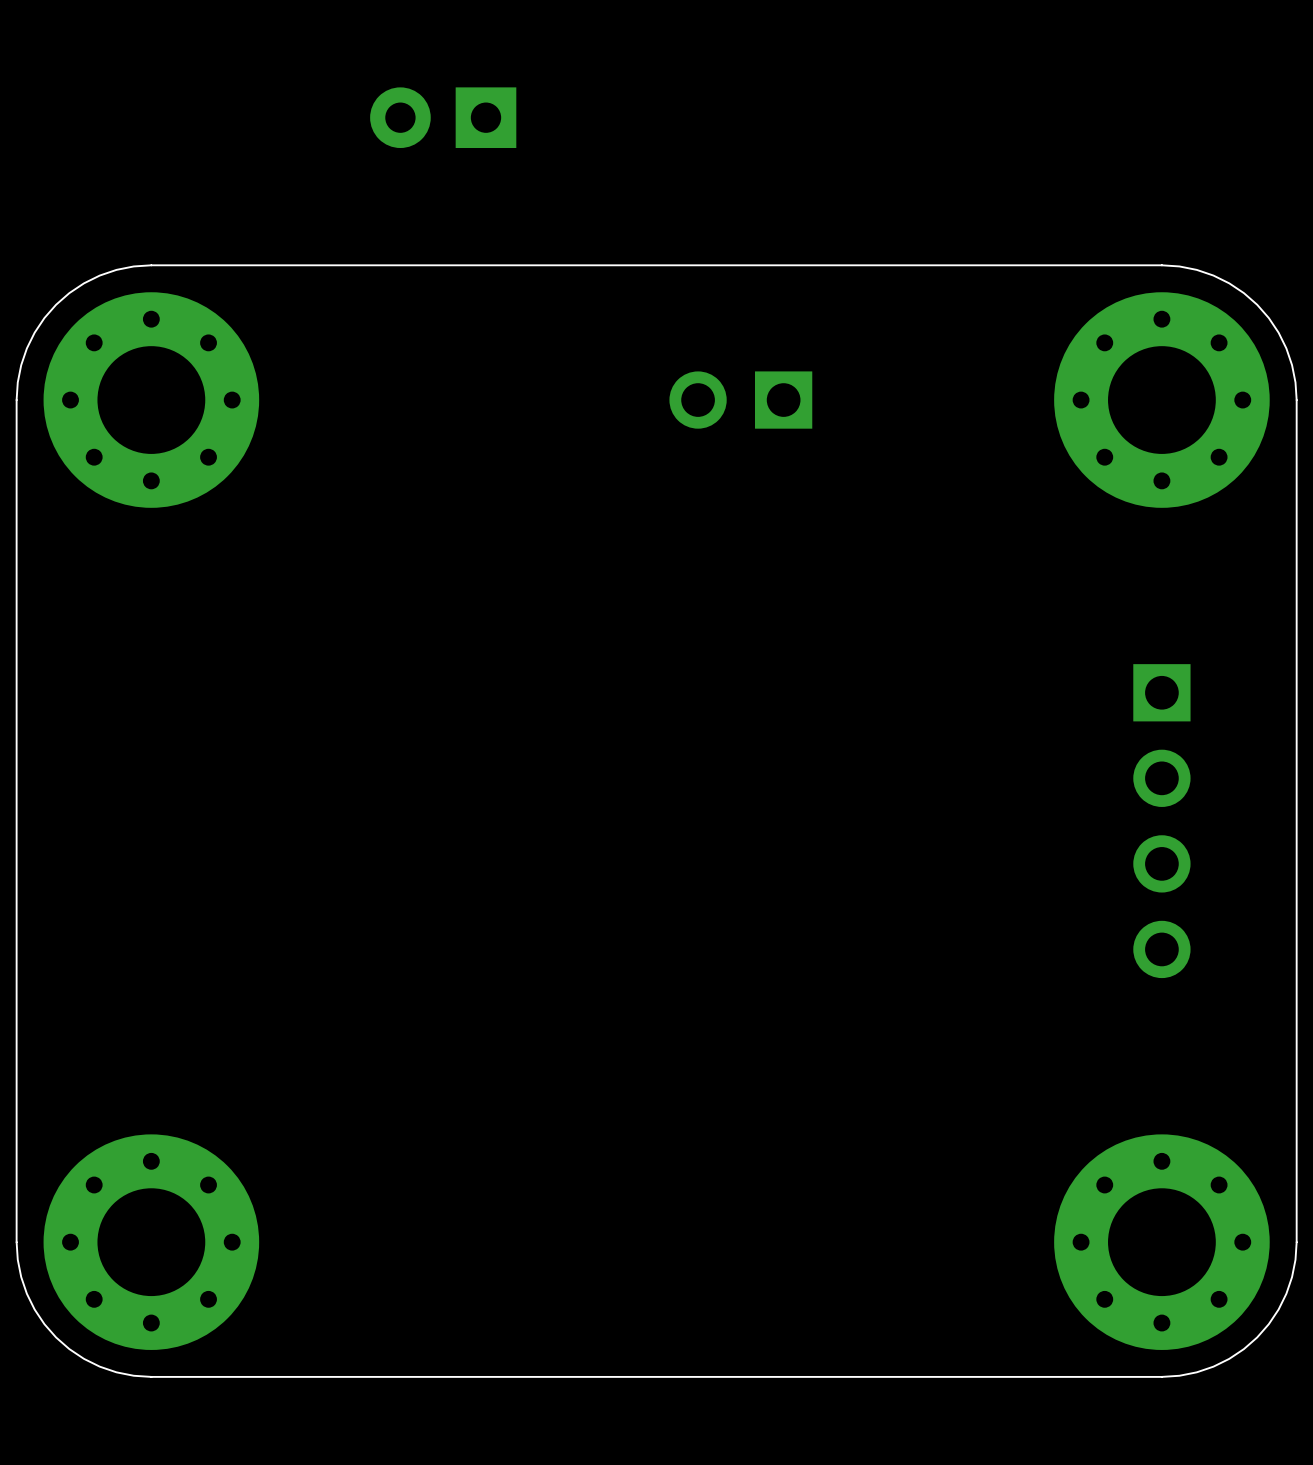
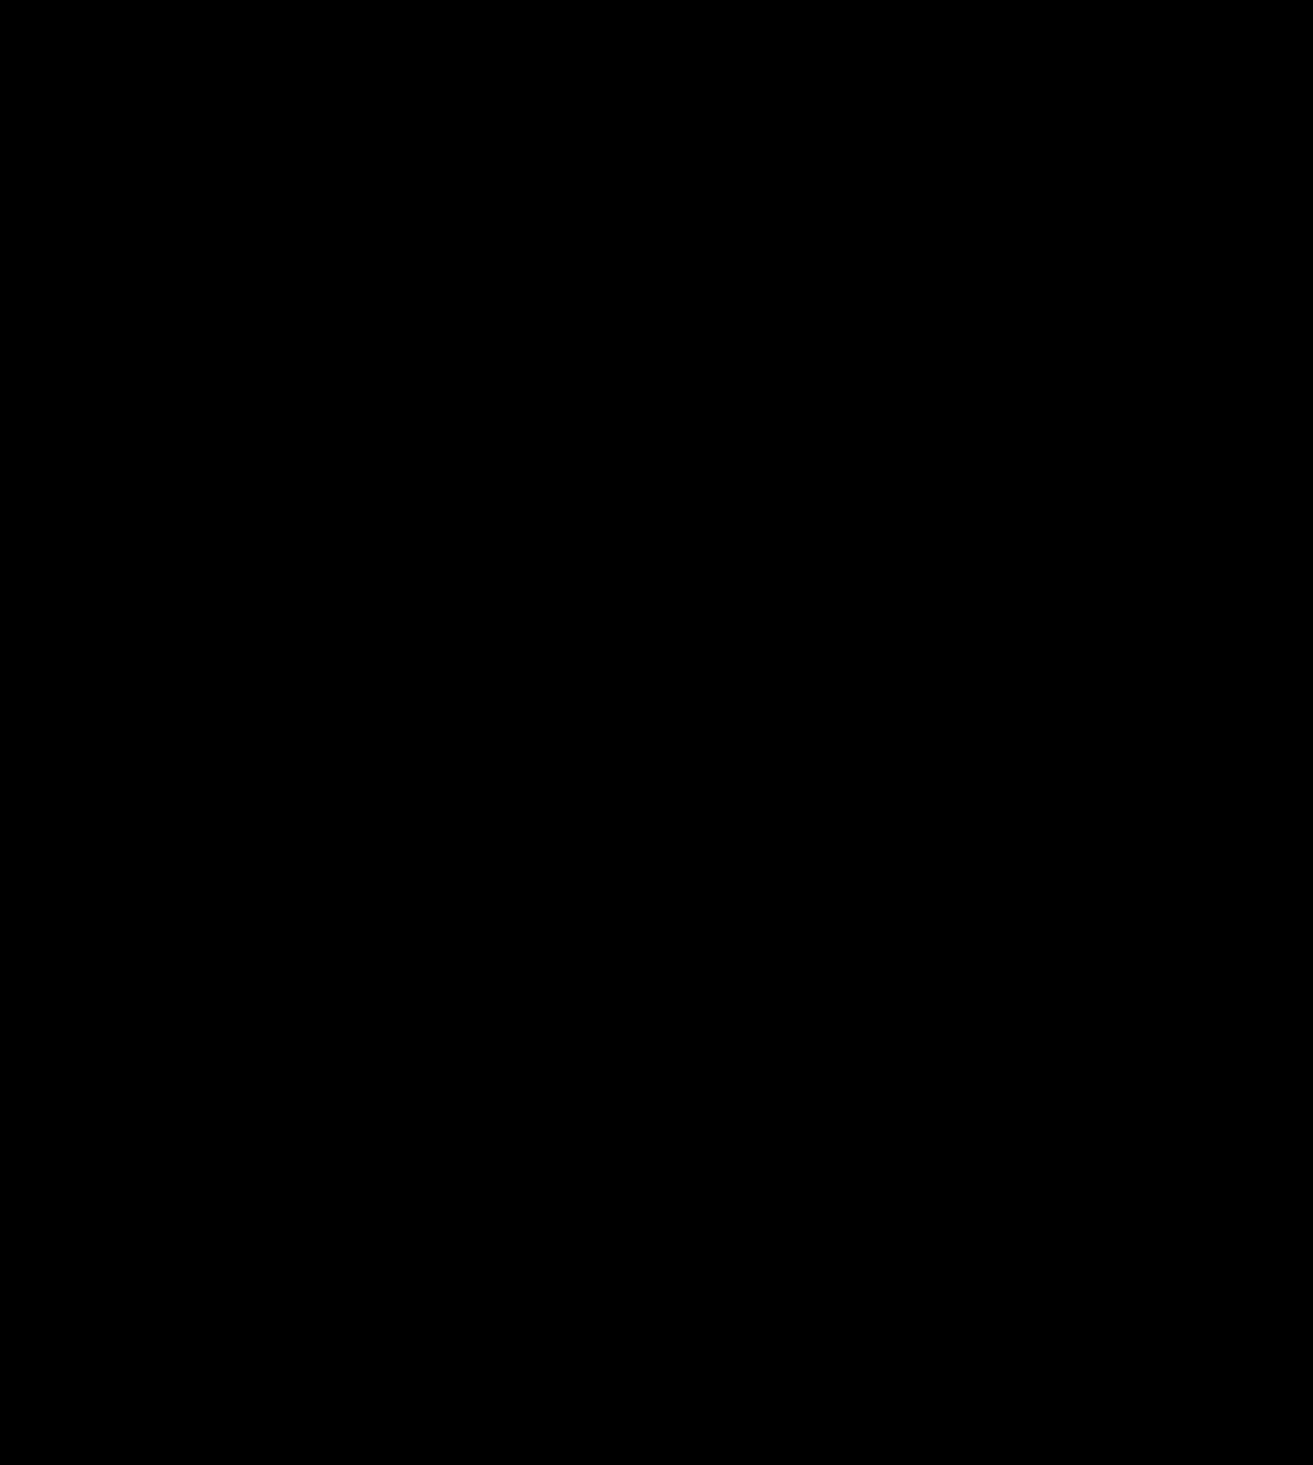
part: (443, 117) -> none
board edge: (1161, 265) (151, 265) (116, 269) (99, 275) (69, 293) (56, 304) (34, 332) (26, 348) (21, 365) (16, 400) (16, 1242) (21, 1277) (26, 1293) (34, 1309) (56, 1337) (83, 1358) (99, 1366) (116, 1372) (151, 1376) (1161, 1376) (1196, 1372) (1213, 1366) (1229, 1358) (1257, 1337) (1268, 1324) (1286, 1293) (1292, 1277) (1296, 1242) (1295, 382) (1292, 365) (1278, 332) (1268, 318) (1243, 293) (1213, 275) (1196, 269) (1161, 265) -> none
part: (151, 400) -> none
part: (740, 400) -> none
part: (1161, 400) -> none
part: (1161, 821) -> none
part: (151, 1242) -> none
part: (1161, 1242) -> none

